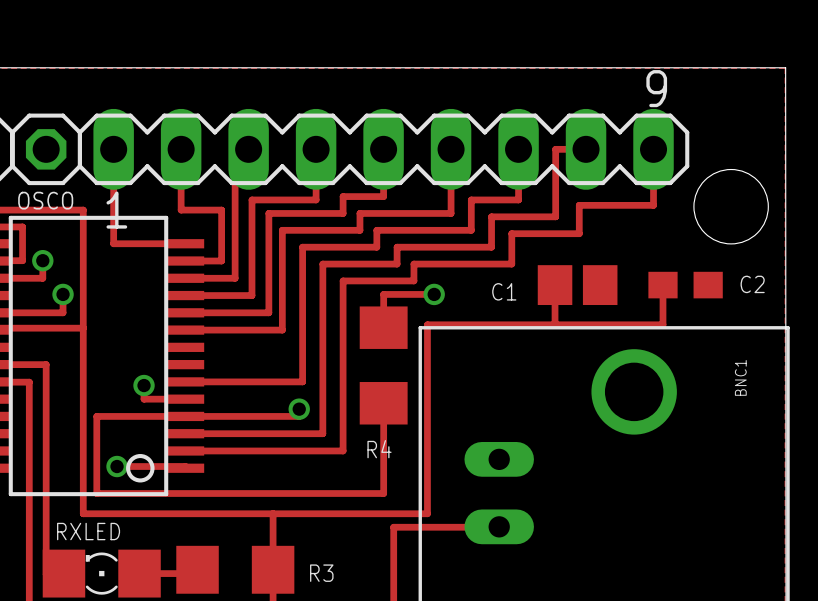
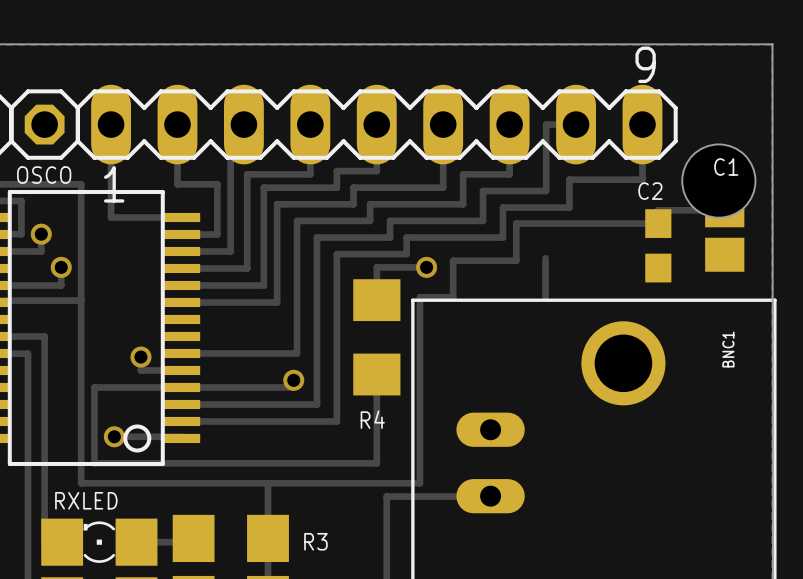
C2 name position: C2 (752, 284) -> C2 (650, 191)
C1 rotation: 0° (577, 285) -> 90° clockwise (724, 232)
C1 position: (577, 285) -> (724, 232)
track: (663, 285) (663, 324) (461, 324) -> (724, 210) (658, 210) (658, 223) (516, 223) (516, 260) (453, 260) (453, 297)
C2 rotation: 0° (685, 285) -> 90° clockwise (658, 245)

